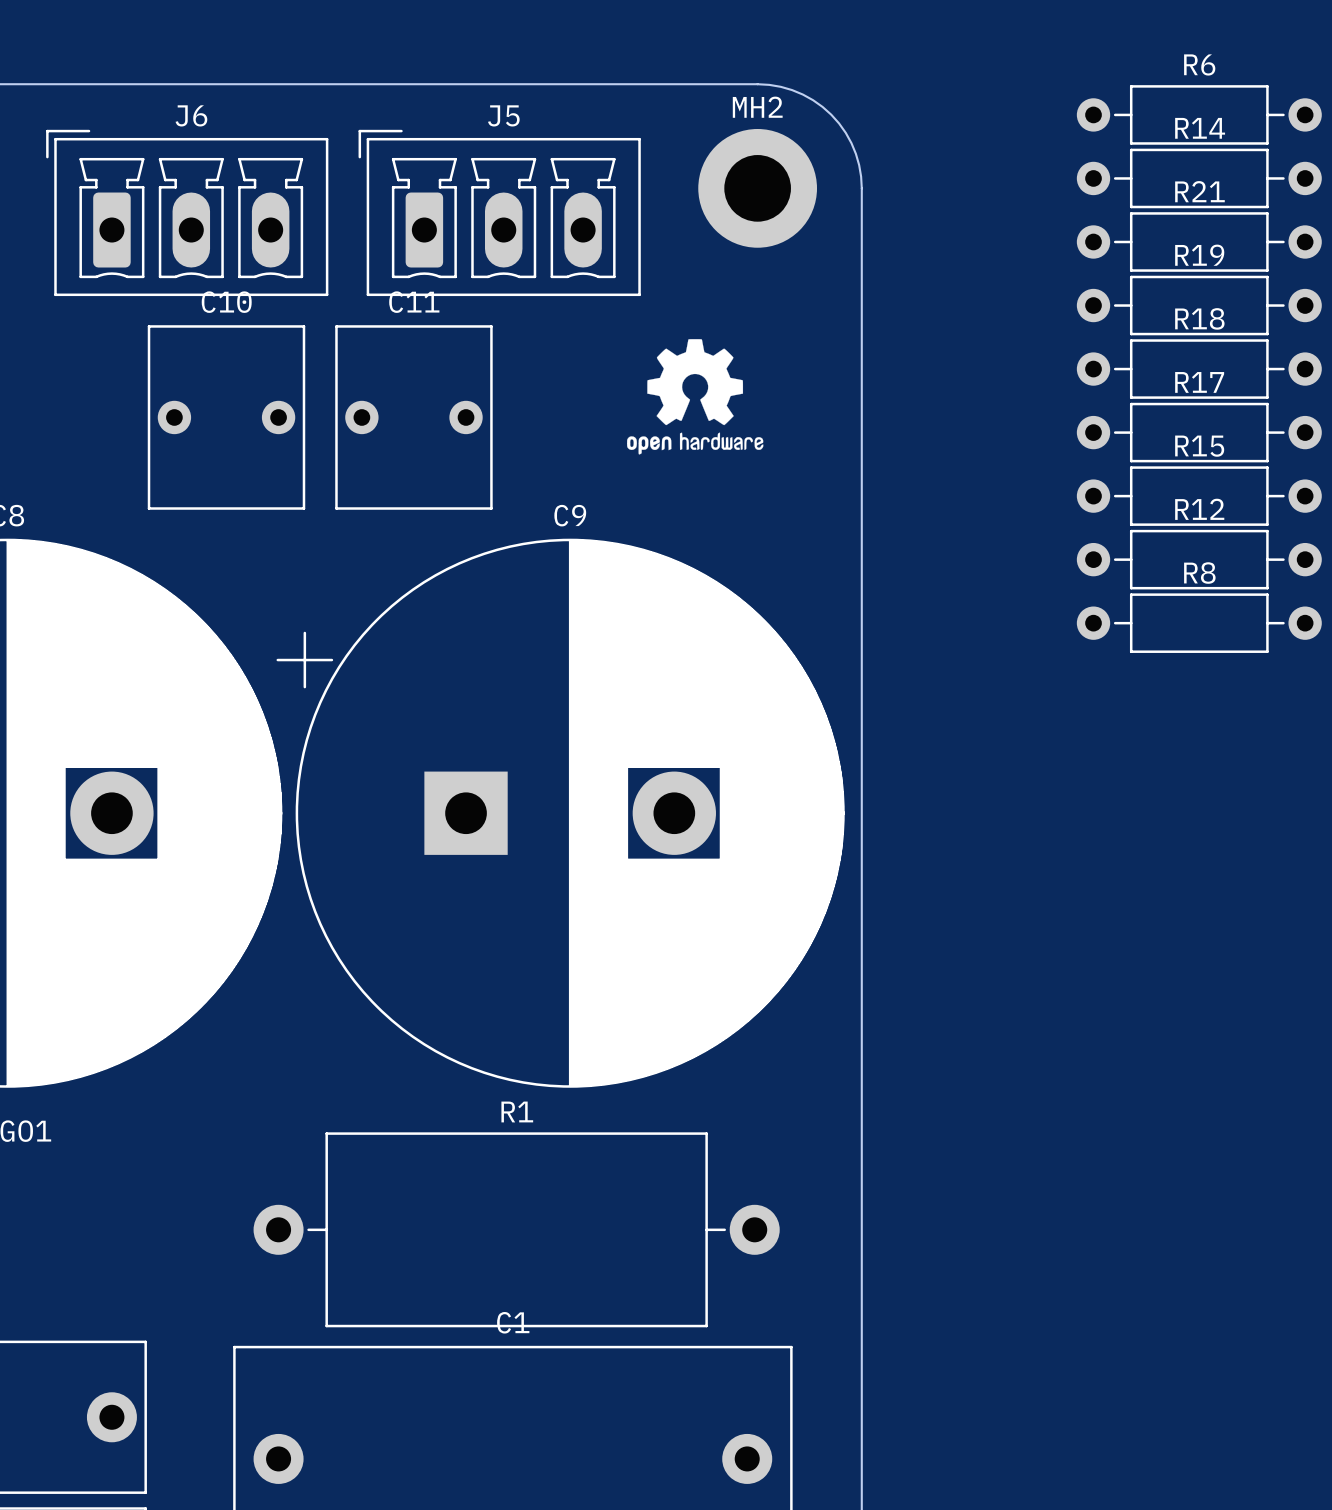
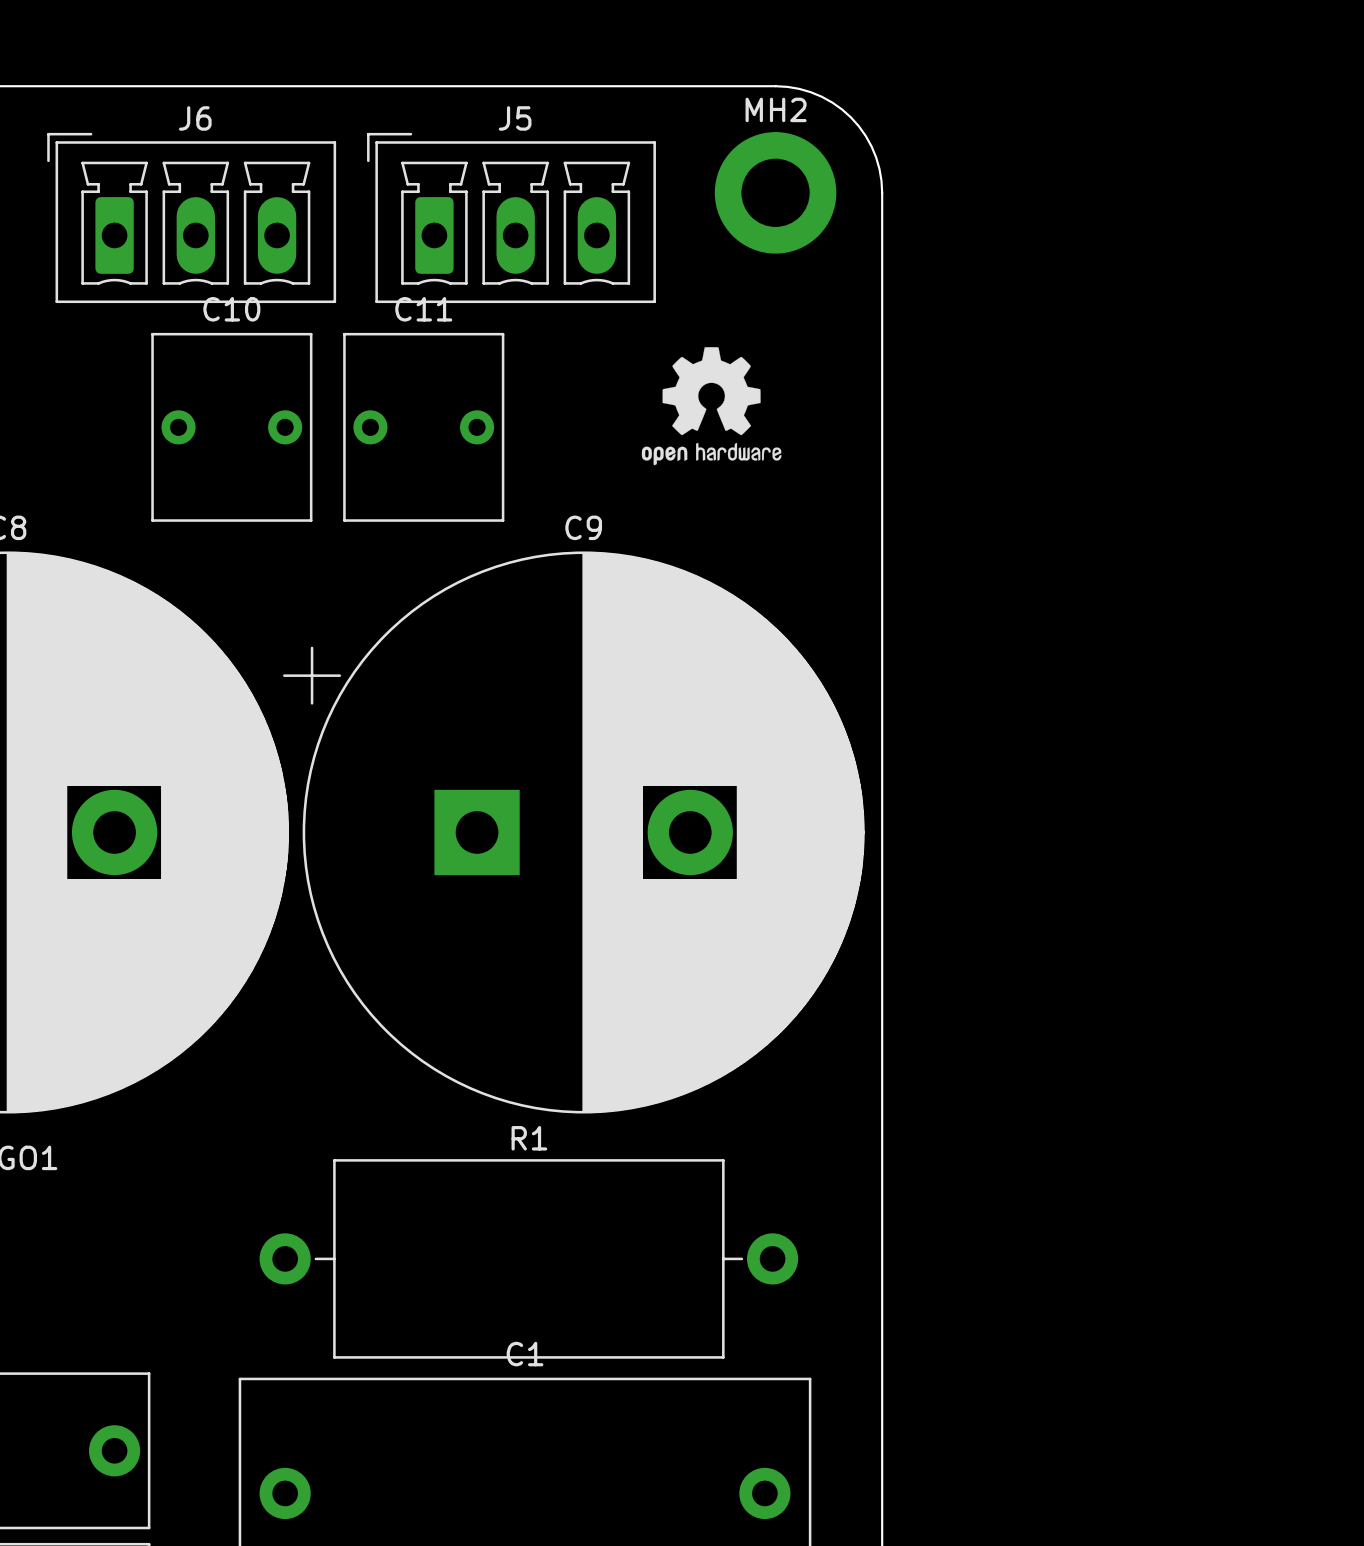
R6: (1199, 114) -> none
R14: (1199, 178) -> none
R21: (1199, 241) -> none
R19: (1199, 305) -> none
R18: (1199, 369) -> none
R17: (1199, 432) -> none
R15: (1199, 496) -> none
R12: (1199, 559) -> none
R8: (1199, 623) -> none

